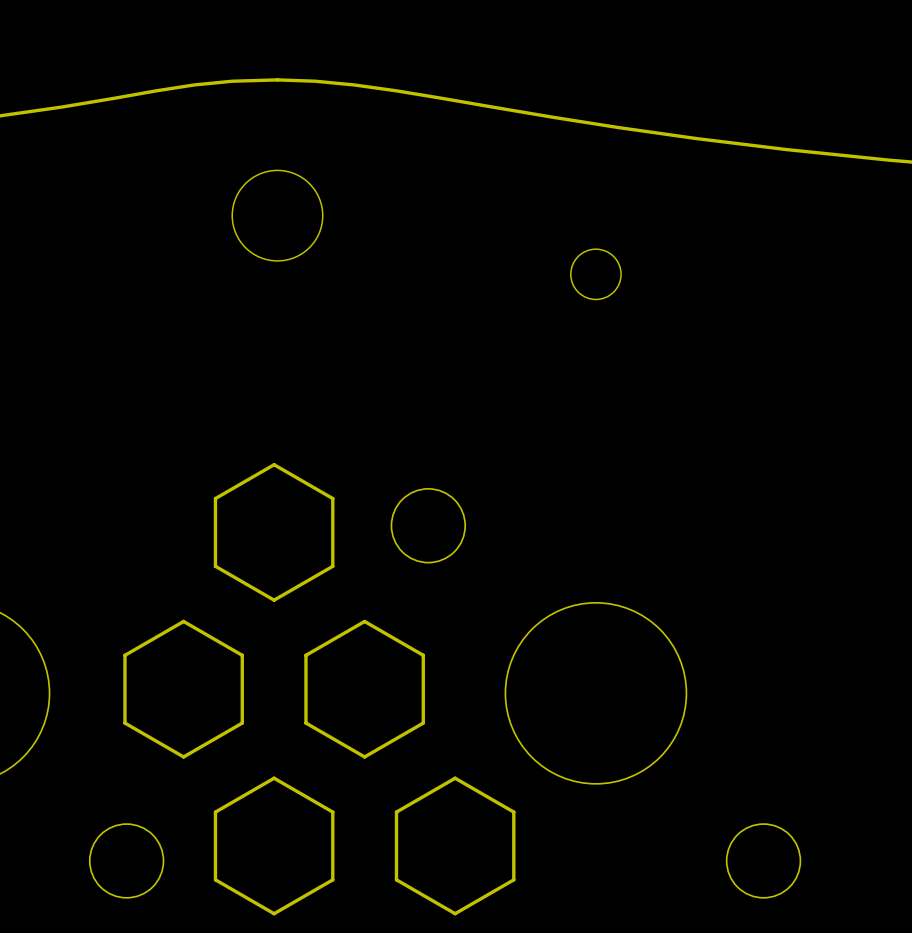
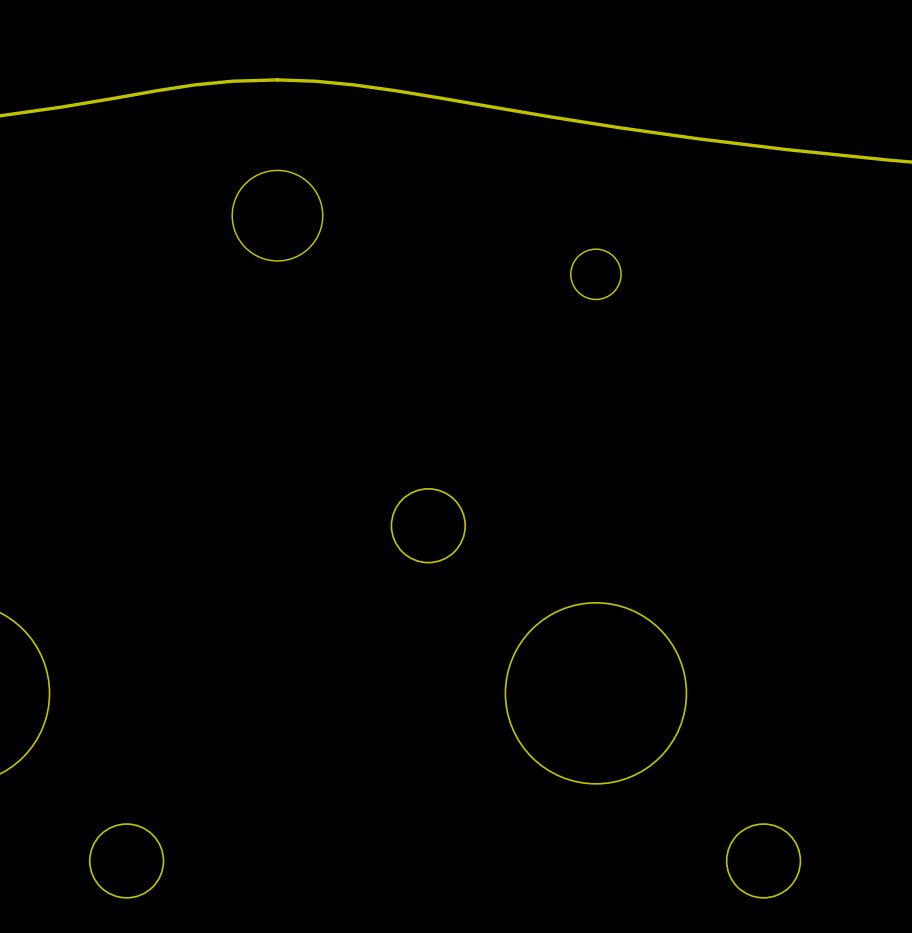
board edge: (274, 464) (215, 498) (215, 566) (274, 600) (332, 566) (332, 498) (274, 464) -> none
board edge: (183, 621) (242, 655) (242, 723) (183, 756) (124, 723) (124, 655) (183, 621) -> none
board edge: (364, 621) (305, 655) (305, 723) (364, 756) (423, 723) (423, 655) (364, 621) -> none
board edge: (274, 778) (215, 812) (215, 879) (274, 913) (332, 879) (332, 812) (274, 778) -> none
board edge: (455, 778) (513, 812) (513, 879) (455, 913) (396, 879) (396, 812) (455, 778) -> none

